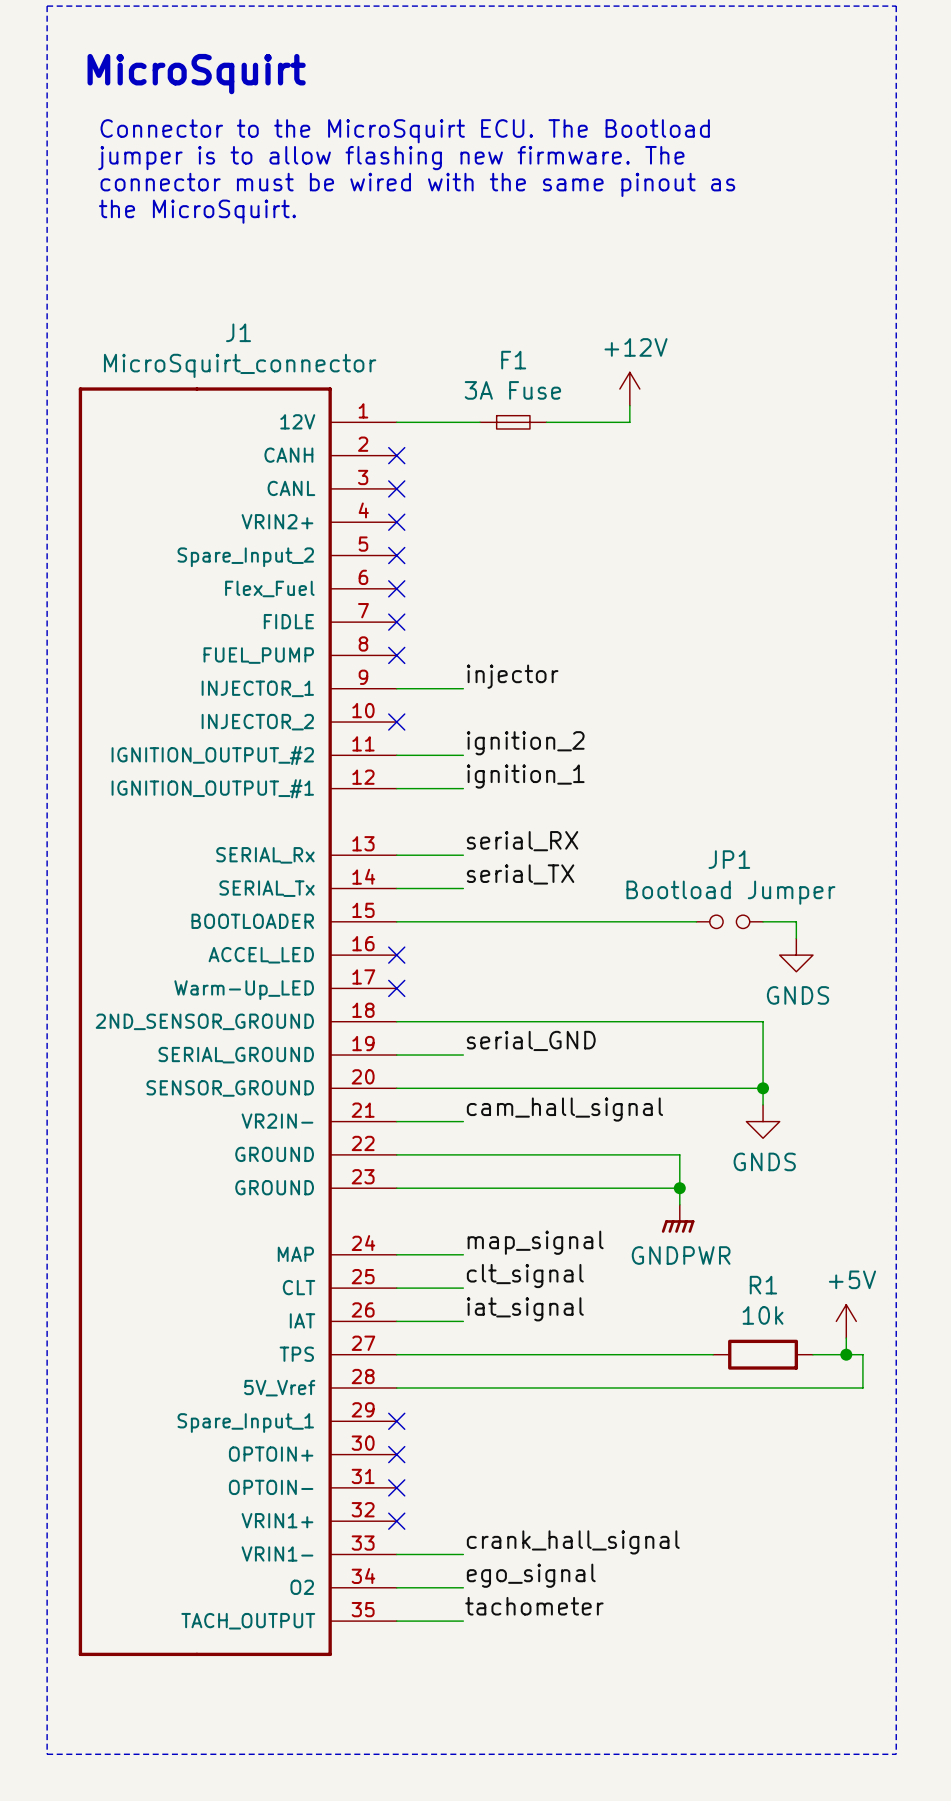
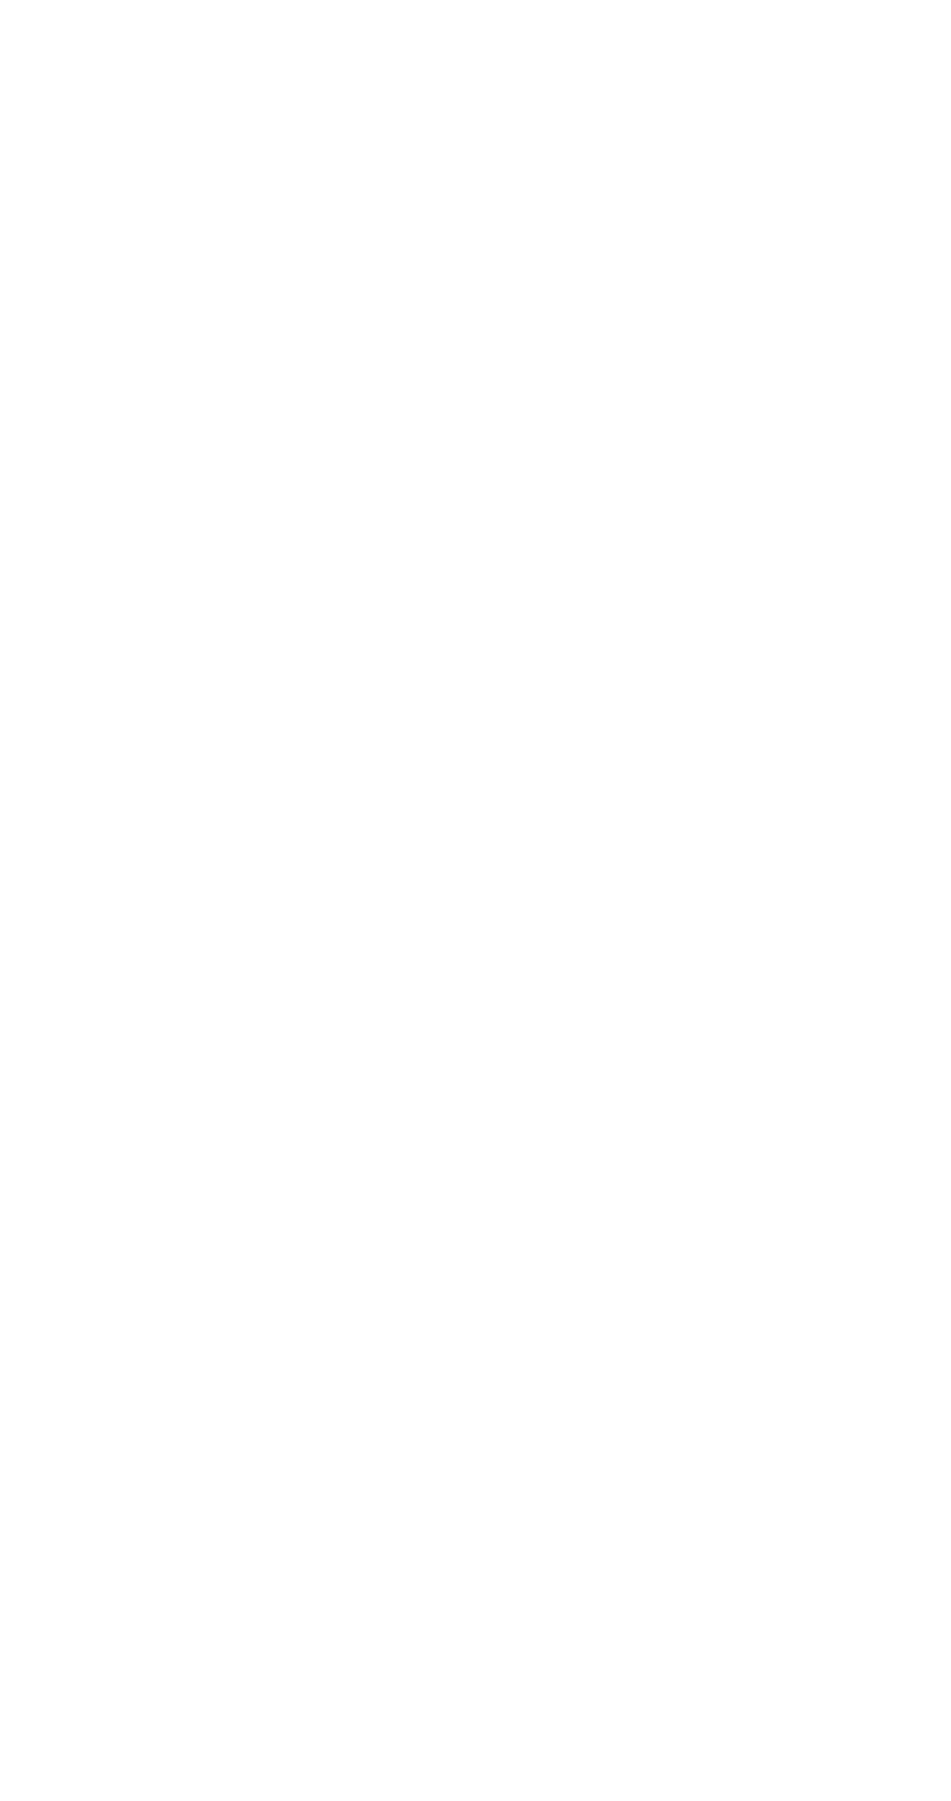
line: (47, 6) (896, 6) (896, 1754) (47, 1754) (47, 6) -> none
text: MicroSquirt (196, 74) -> none
text: Connector to the MicroSquirt ECU. The Bootload (405, 131) -> none
text: jumper is to allow flashing new firmware. The (391, 158) -> none
text: connector must be wired with the same pinout as (417, 184) -> none
text: the MicroSquirt. (197, 211) -> none
power symbol: +12V (629, 389) -> none
wire: (629, 405) (629, 422) (546, 422) -> none
wire: (396, 422) (480, 422) -> none
F1: 3A Fuse (513, 422) -> none
no-connect mark: (396, 455) -> none
no-connect mark: (396, 488) -> none
no-connect mark: (396, 522) -> none
no-connect mark: (396, 555) -> none
no-connect mark: (396, 588) -> none
no-connect mark: (396, 622) -> none
no-connect mark: (396, 655) -> none
label: injector (512, 676) -> none
wire: (396, 688) (463, 688) -> none
no-connect mark: (396, 722) -> none
label: ignition_2 (525, 743) -> none
wire: (396, 755) (463, 755) -> none
label: ignition_1 (525, 776) -> none
wire: (396, 788) (463, 788) -> none
label: serial_RX (522, 841) -> none
wire: (396, 855) (463, 855) -> none
label: serial_TX (520, 874) -> none
wire: (396, 888) (463, 888) -> none
wire: (396, 921) (696, 921) -> none
JP1: Bootload Jumper (729, 921) -> none
wire: (763, 921) (796, 921) (796, 938) -> none
no-connect mark: (396, 955) -> none
power symbol: GNDS (796, 955) -> none
no-connect mark: (396, 988) -> none
J1: MicroSquirt_connector (237, 1021) -> none
wire: (396, 1021) (763, 1021) (763, 1104) -> none
label: serial_GND (531, 1040) -> none
wire: (396, 1055) (463, 1055) -> none
wire: (396, 1088) (763, 1088) -> none
junction: (763, 1088) -> none
label: cam_hall_signal (564, 1109) -> none
wire: (396, 1121) (463, 1121) -> none
power symbol: GNDS (763, 1121) -> none
wire: (396, 1154) (679, 1154) (679, 1204) -> none
wire: (396, 1188) (679, 1188) -> none
junction: (679, 1188) -> none
power symbol: GNDPWR (678, 1218) -> none
label: map_signal (535, 1242) -> none
wire: (396, 1254) (463, 1254) -> none
label: clt_signal (525, 1276) -> none
wire: (396, 1288) (463, 1288) -> none
label: iat_signal (525, 1309) -> none
wire: (396, 1321) (463, 1321) -> none
power symbol: +5V (846, 1321) -> none
wire: (846, 1338) (846, 1354) -> none
wire: (396, 1354) (713, 1354) -> none
R1: 10k (763, 1354) -> none
wire: (812, 1354) (862, 1354) (862, 1387) (396, 1387) -> none
junction: (846, 1354) -> none
no-connect mark: (396, 1421) -> none
no-connect mark: (396, 1454) -> none
no-connect mark: (396, 1487) -> none
no-connect mark: (396, 1521) -> none
label: crank_hall_signal (573, 1542) -> none
wire: (396, 1554) (463, 1554) -> none
label: ego_signal (531, 1575) -> none
wire: (396, 1587) (463, 1587) -> none
label: tachometer (534, 1606) -> none
wire: (396, 1621) (463, 1621) -> none

